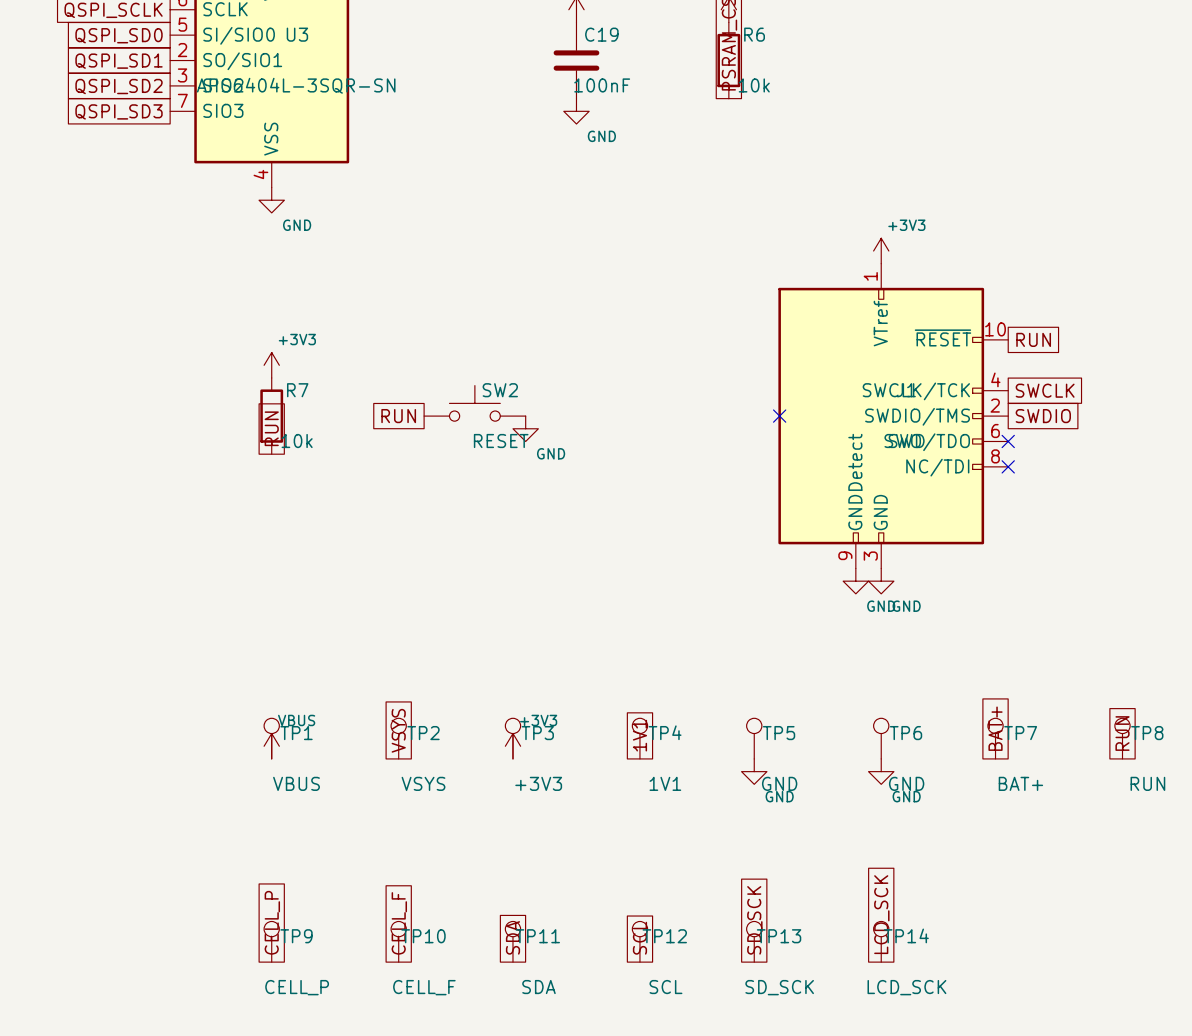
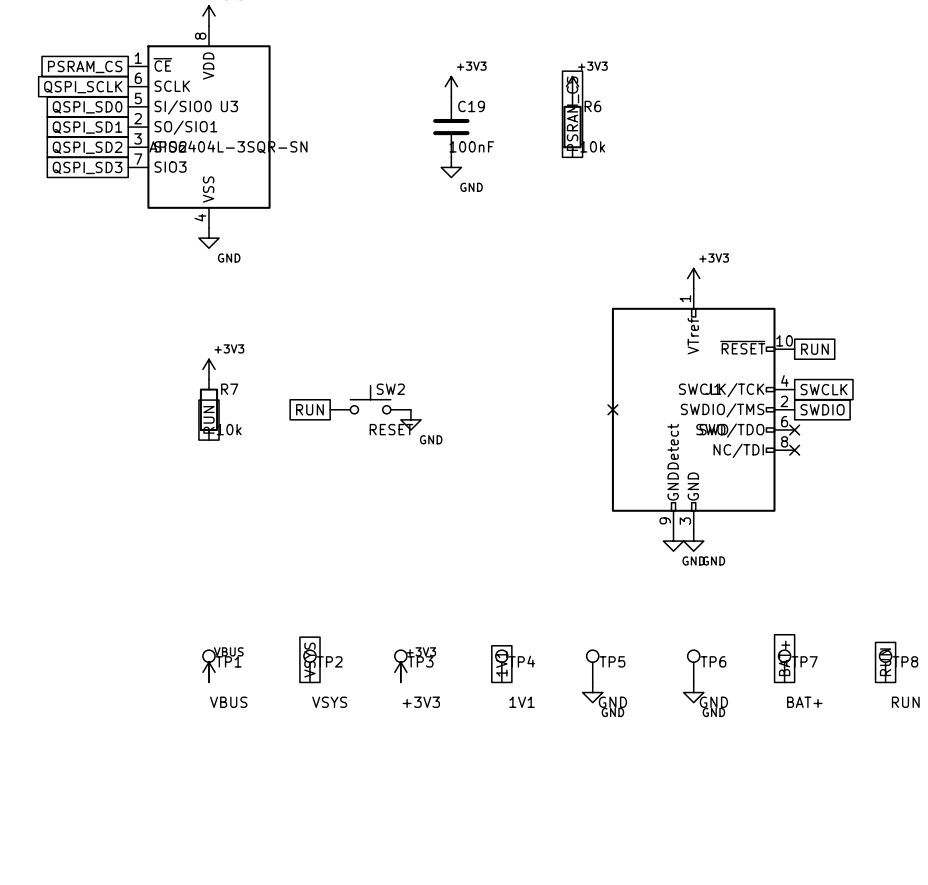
global label: LCD_SCK (881, 914) -> none
global label: SD_SCK (754, 920) -> none
global label: CELL_P (272, 922) -> none
global label: CELL_F (399, 923) -> none
global label: SDA (512, 937) -> none
global label: SCL (639, 938) -> none
TP9: CELL_P (271, 941) -> none
TP10: CELL_F (398, 941) -> none
TP11: SDA (512, 941) -> none
TP12: SCL (639, 941) -> none
TP13: SD_SCK (754, 941) -> none
TP14: LCD_SCK (881, 941) -> none

